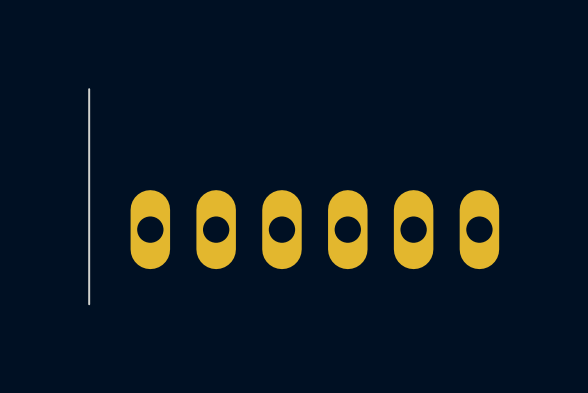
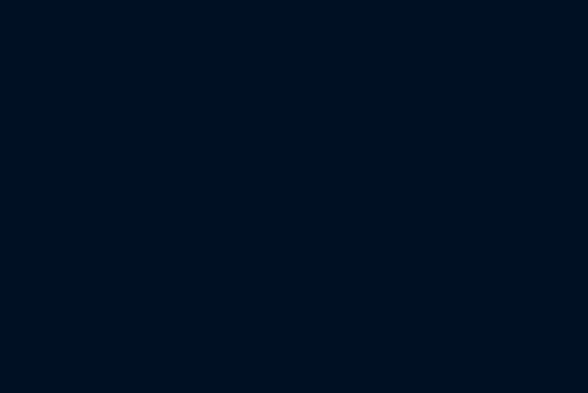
part: (89, 196) -> none
part: (314, 229) -> none

